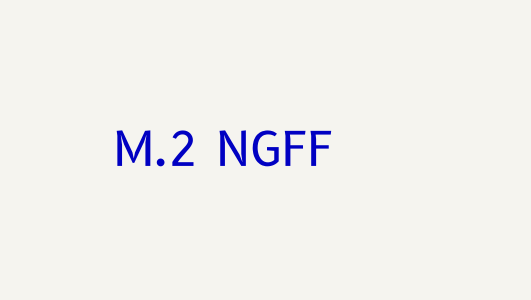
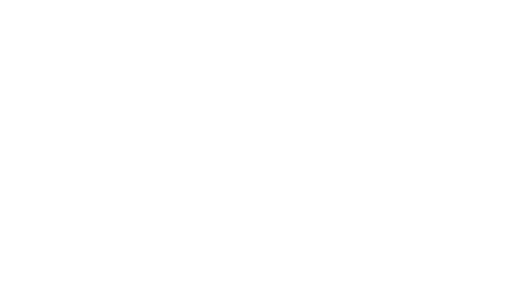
text: M.2 NGFF (223, 148) -> none

